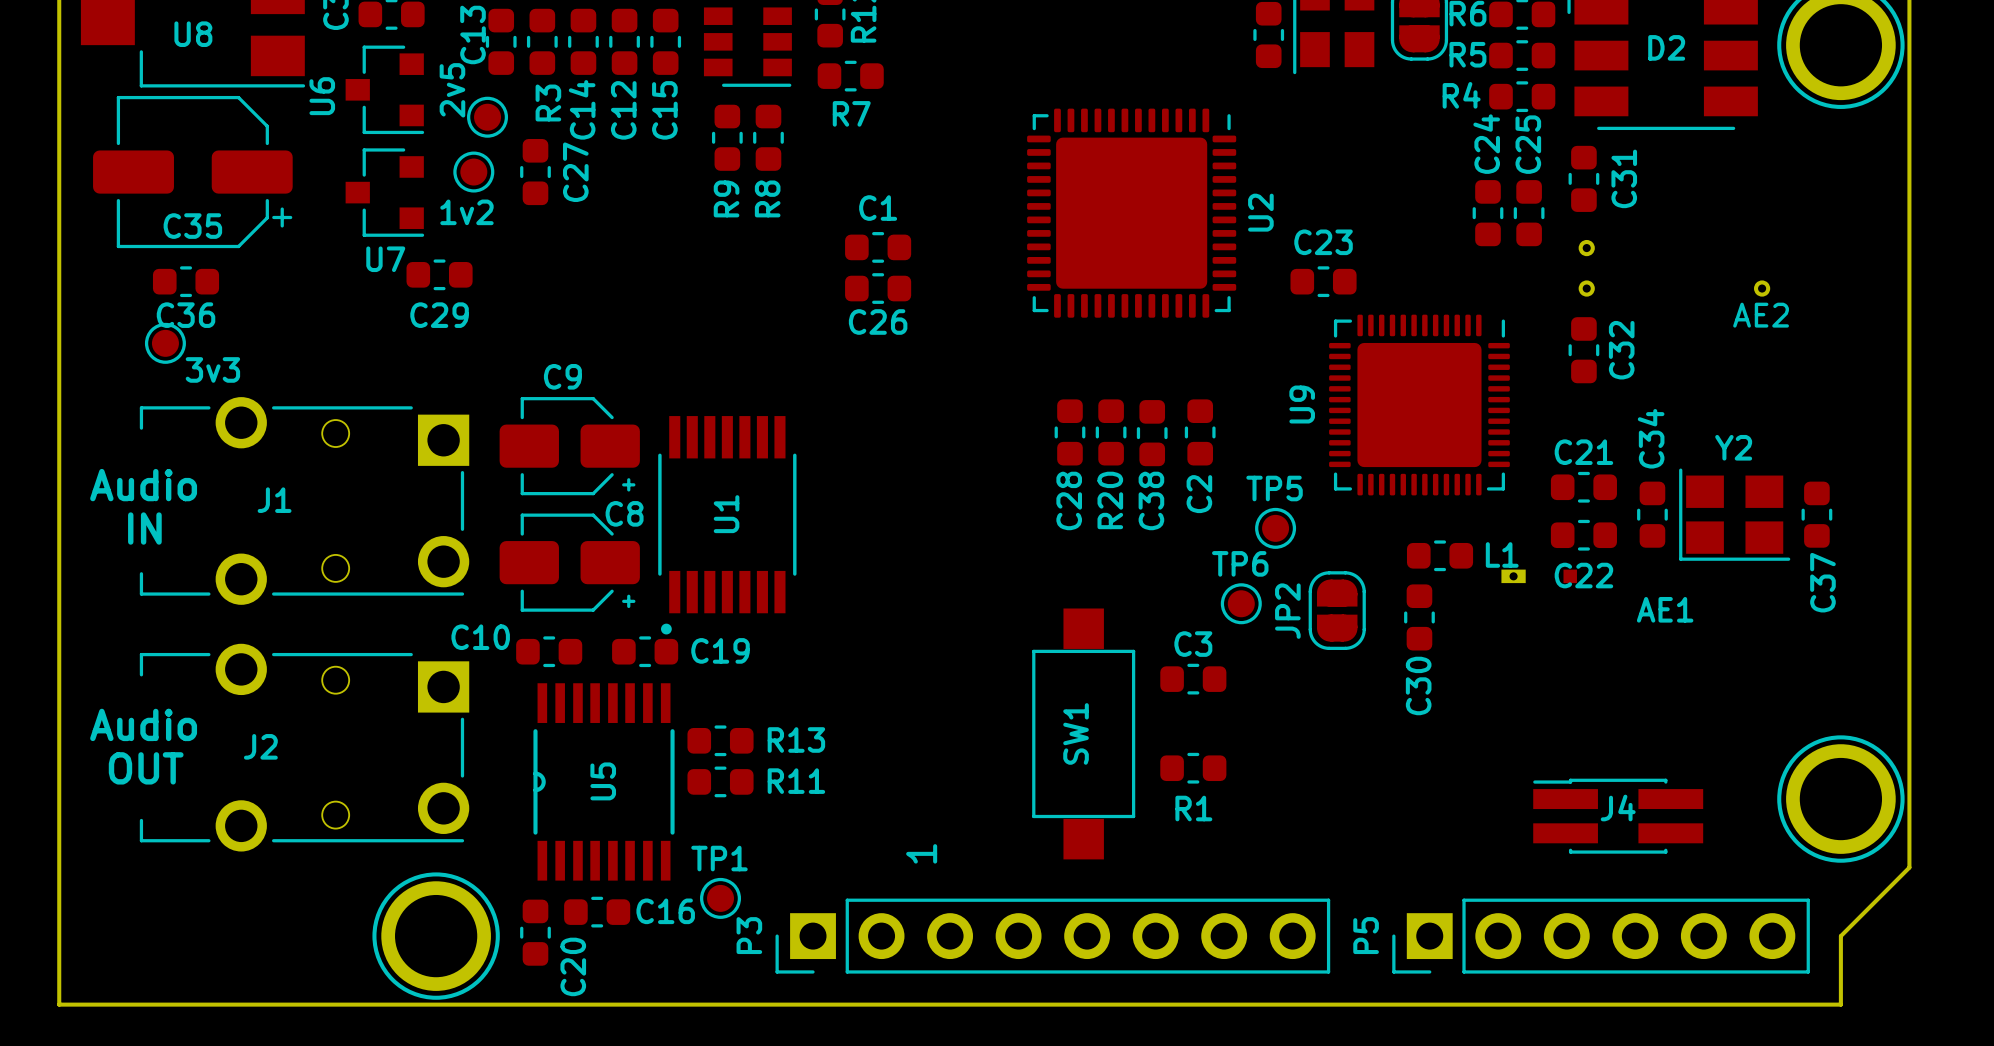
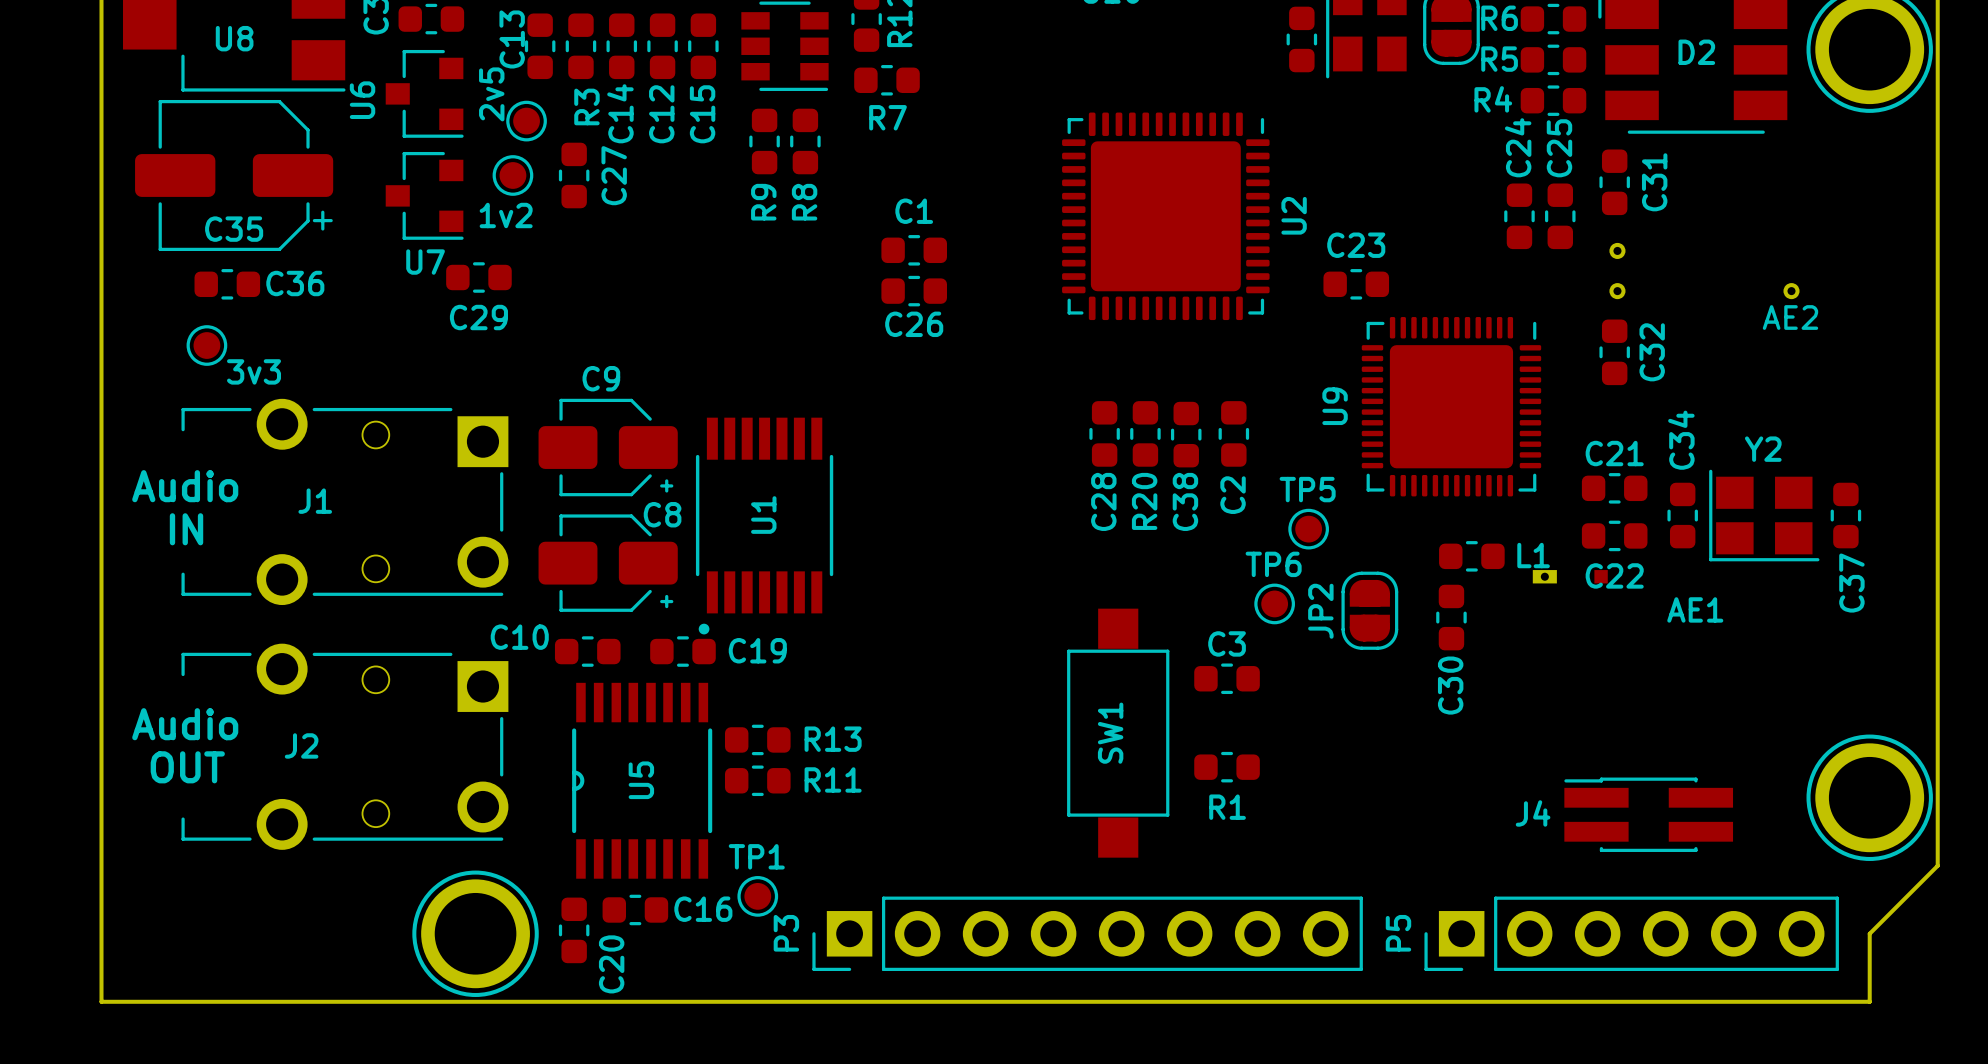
C36 name position: C36 (186, 315) -> C36 (295, 283)
J4 name position: J4 (1618, 808) -> J4 (1533, 813)
text: 1 (921, 853) -> none

